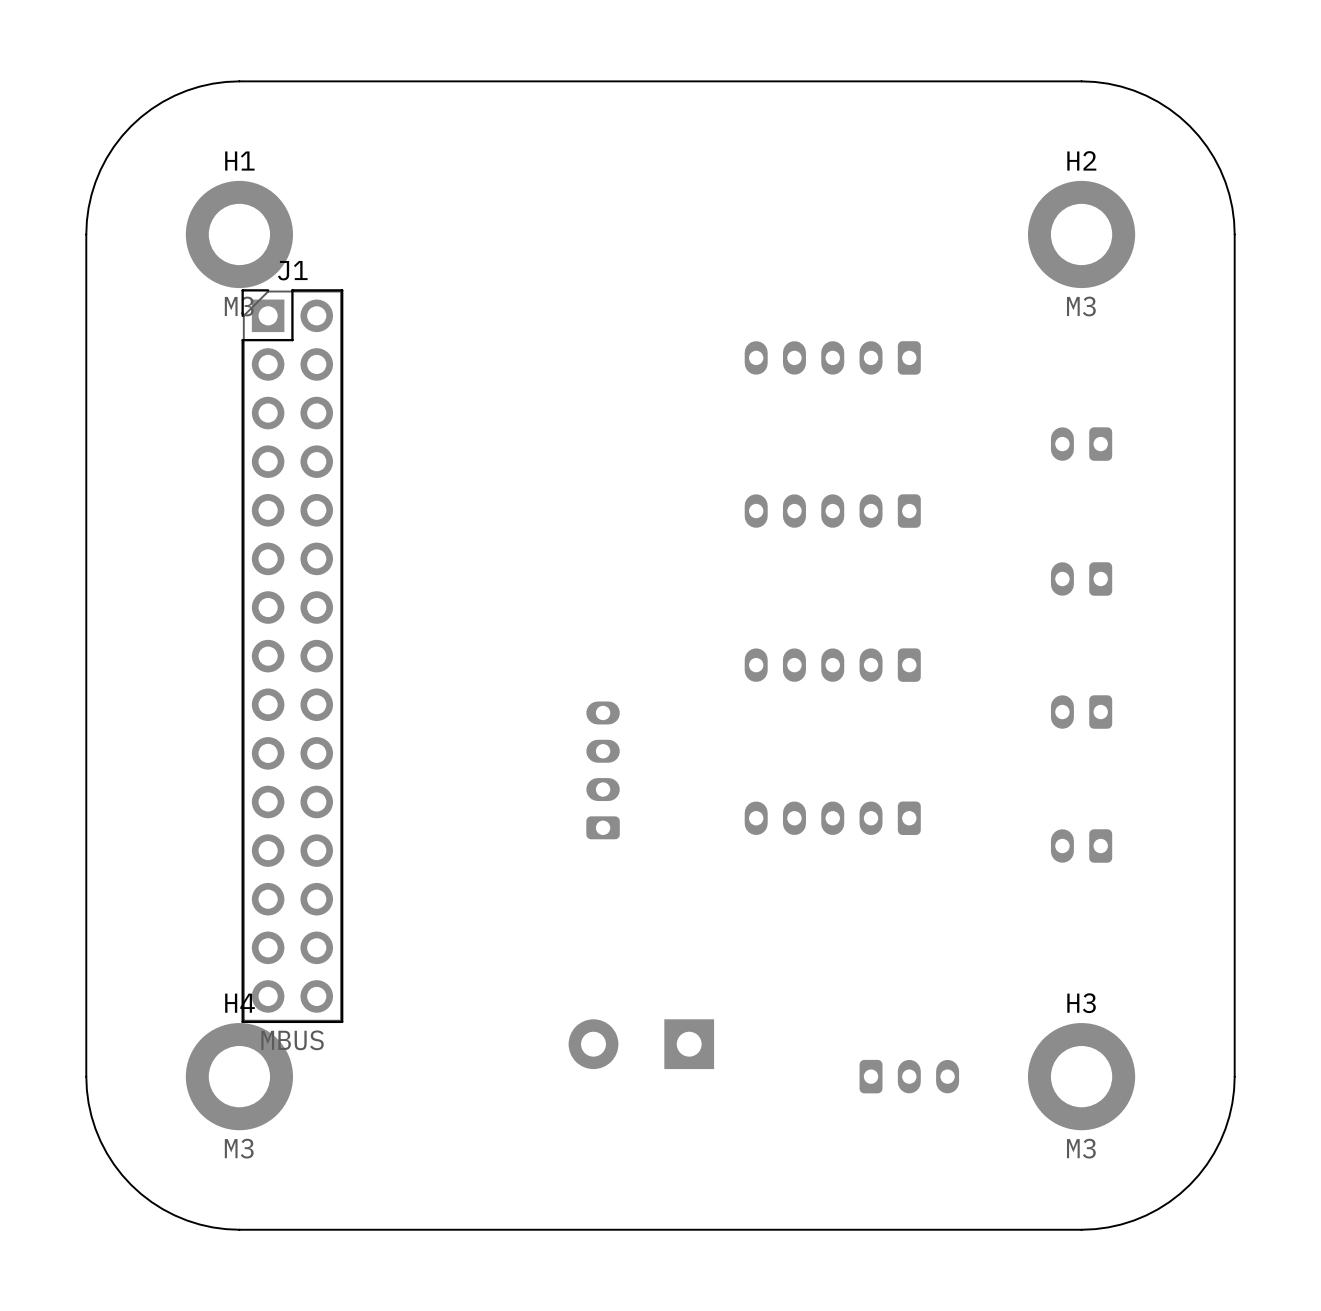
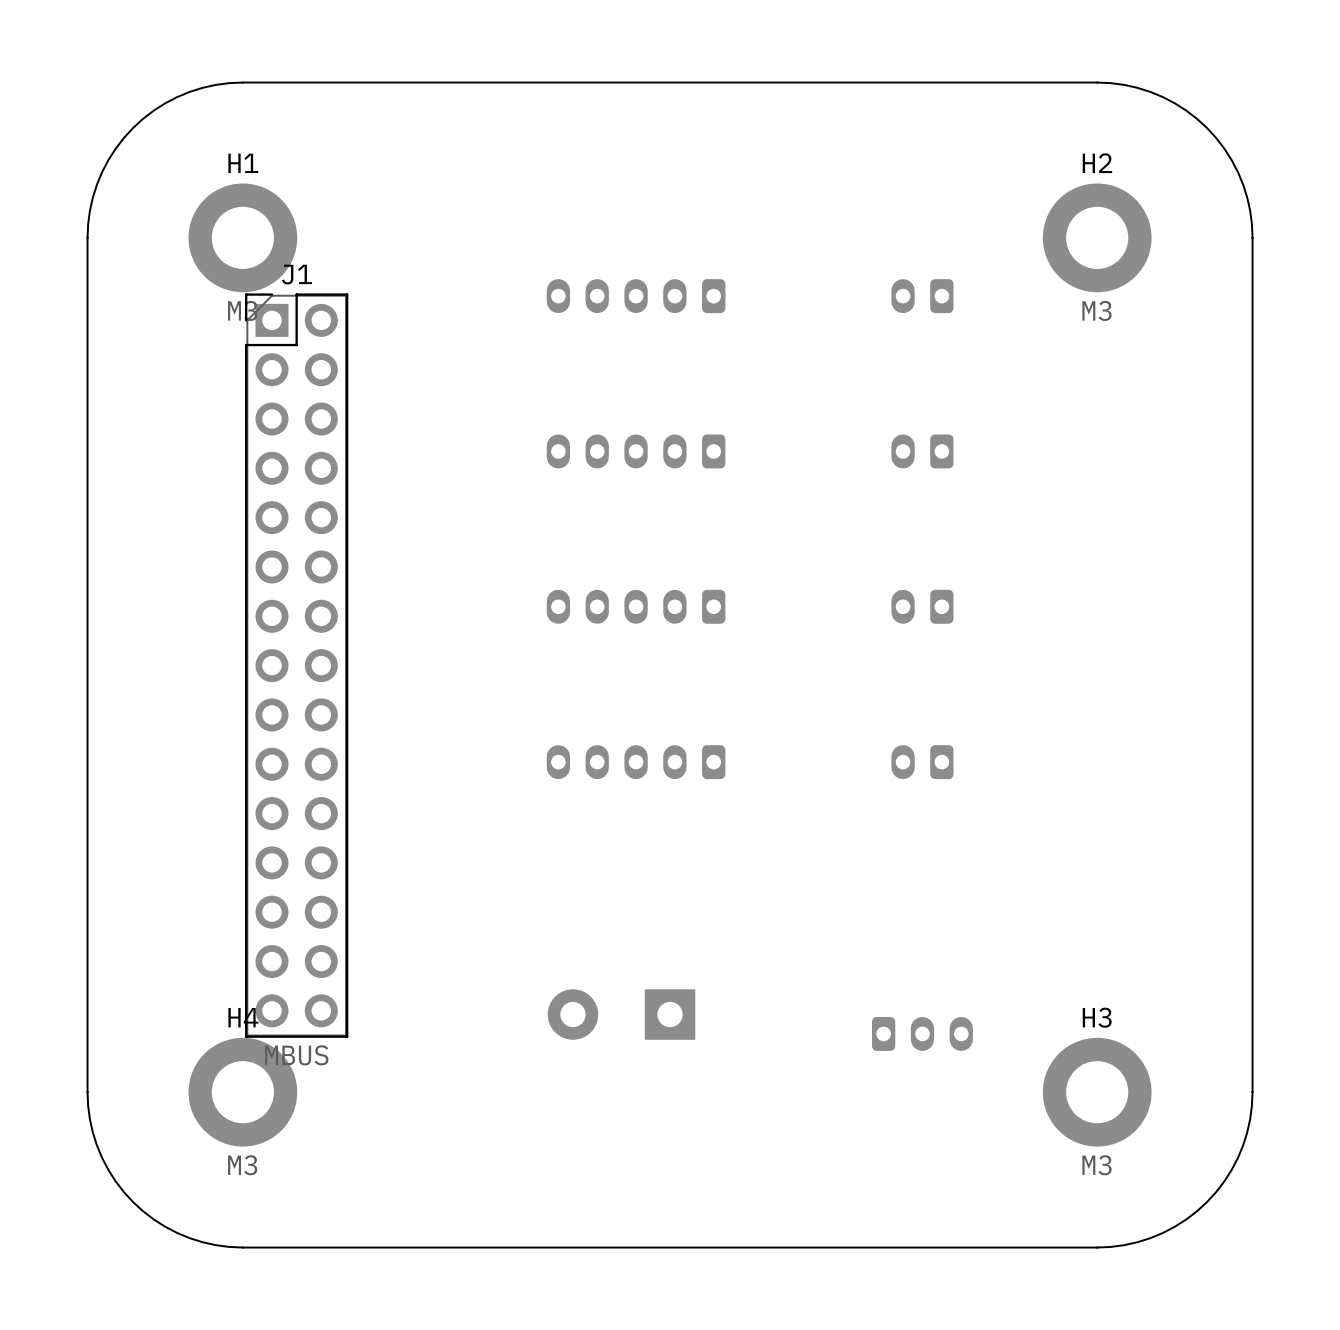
part: none -> (636, 296)
part: none -> (922, 296)
part: (832, 357) -> none
part: (1081, 444) -> none
part: none -> (636, 451)
part: none -> (922, 451)
part: (832, 511) -> none
part: (1081, 578) -> none
part: none -> (636, 606)
part: none -> (922, 606)
part: (832, 665) -> none
part: (1081, 712) -> none
part: none -> (636, 762)
part: none -> (922, 762)
part: (603, 770) -> none
part: (832, 818) -> none
part: (1081, 846) -> none
part position: (641, 1044) -> (621, 1014)
part position: (909, 1076) -> (922, 1033)

